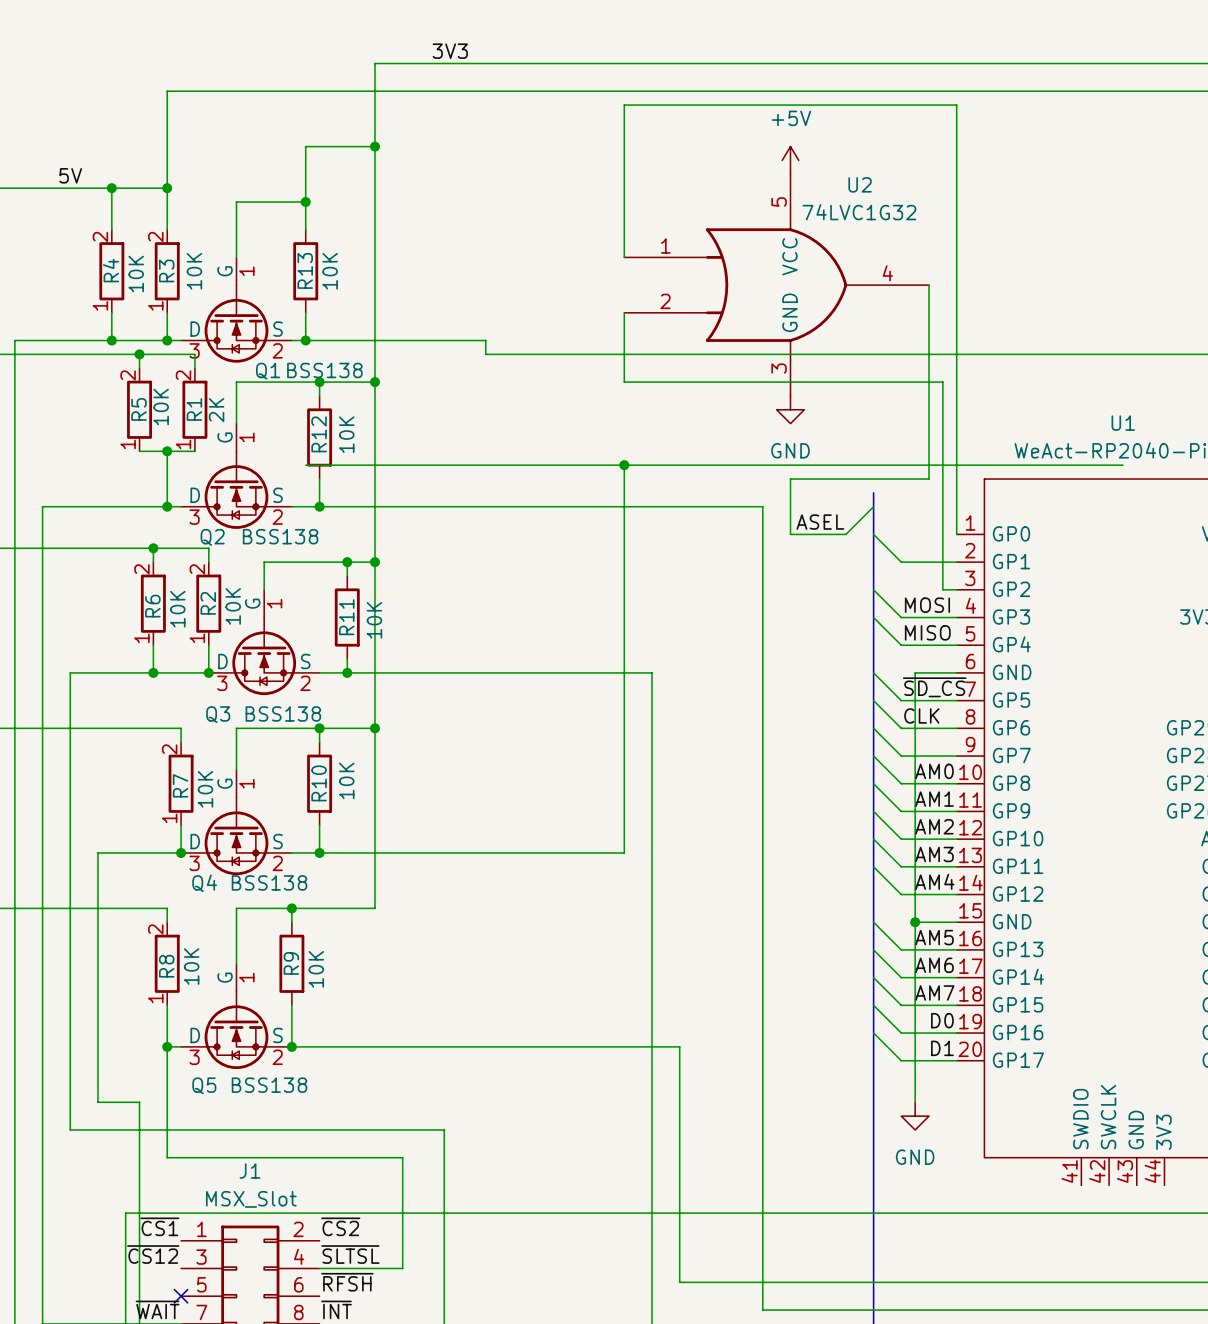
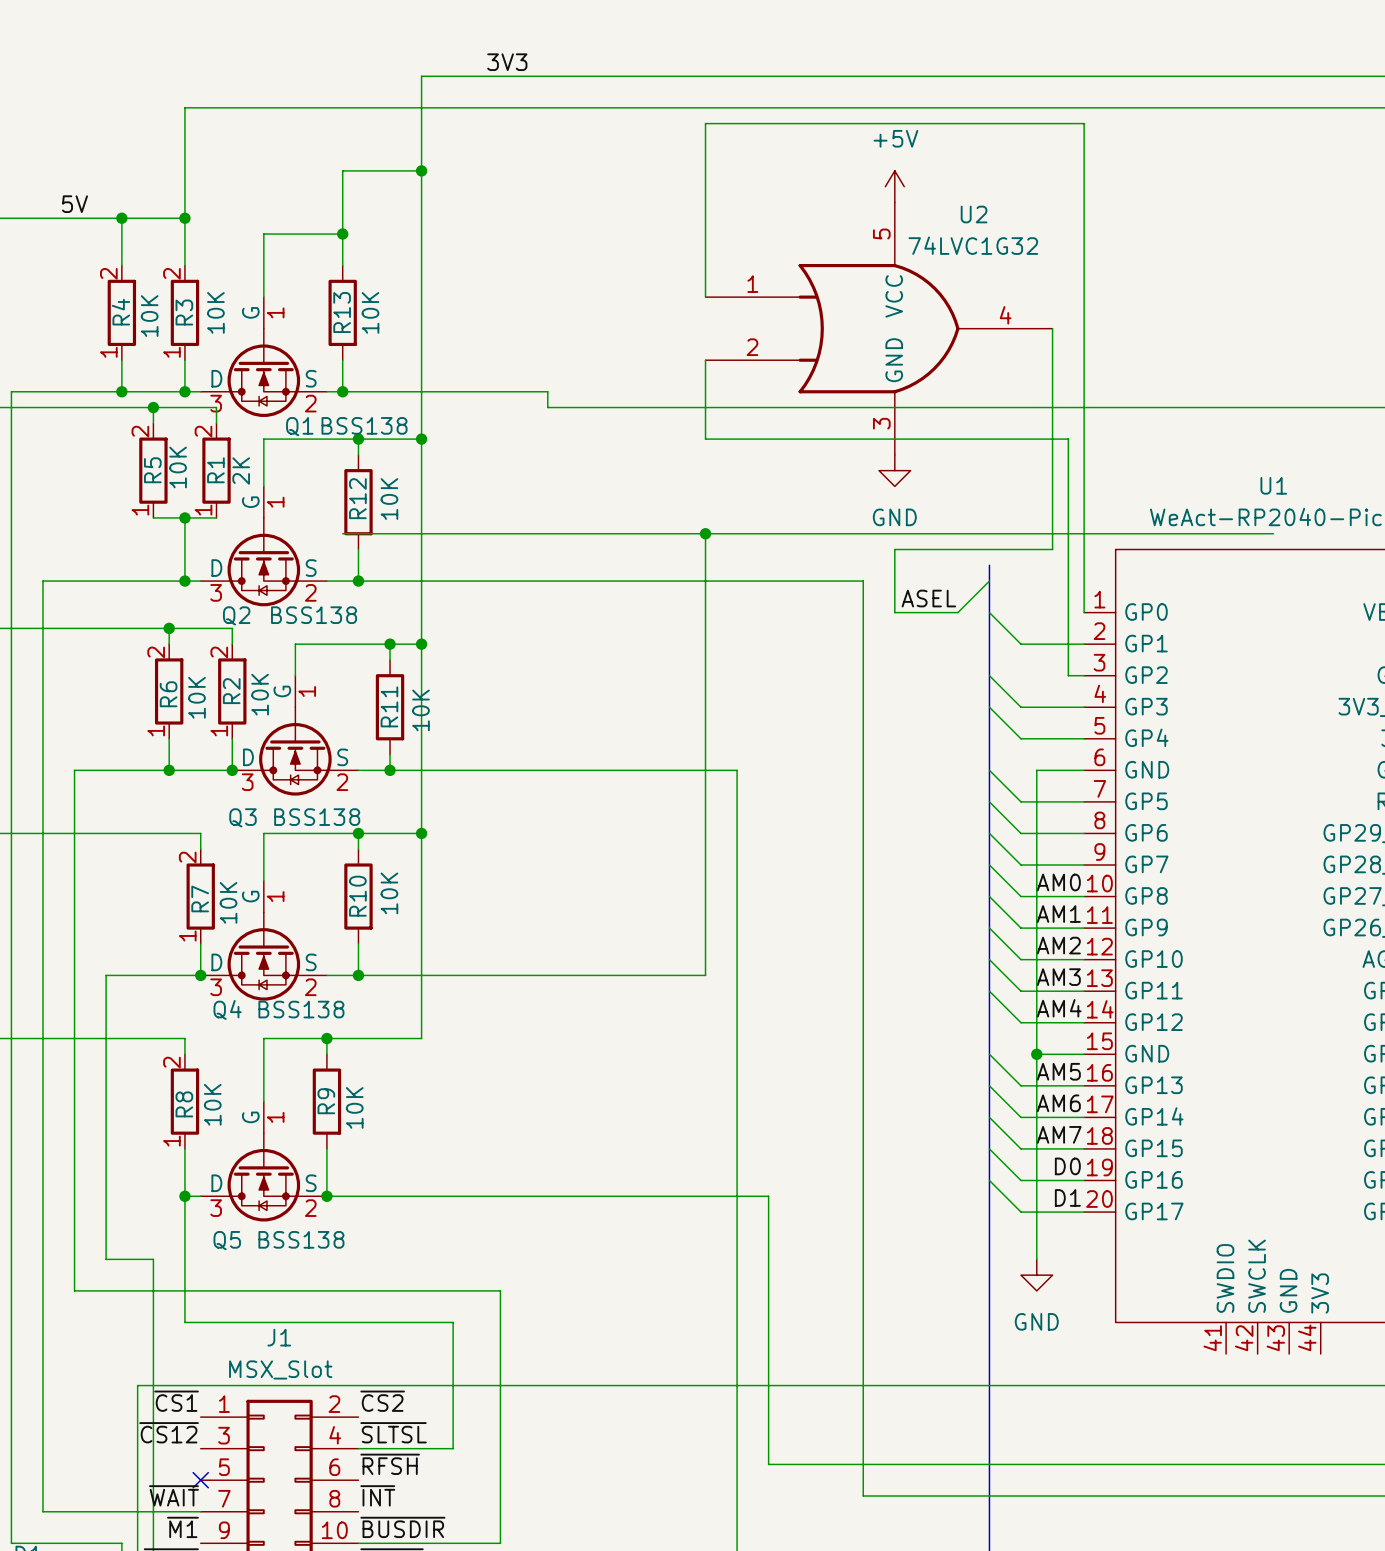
label: MOSI (927, 605) -> none
label: MISO (927, 632) -> none
label: ~{SD_CS} (934, 687) -> none
label: CLK (921, 715) -> none

